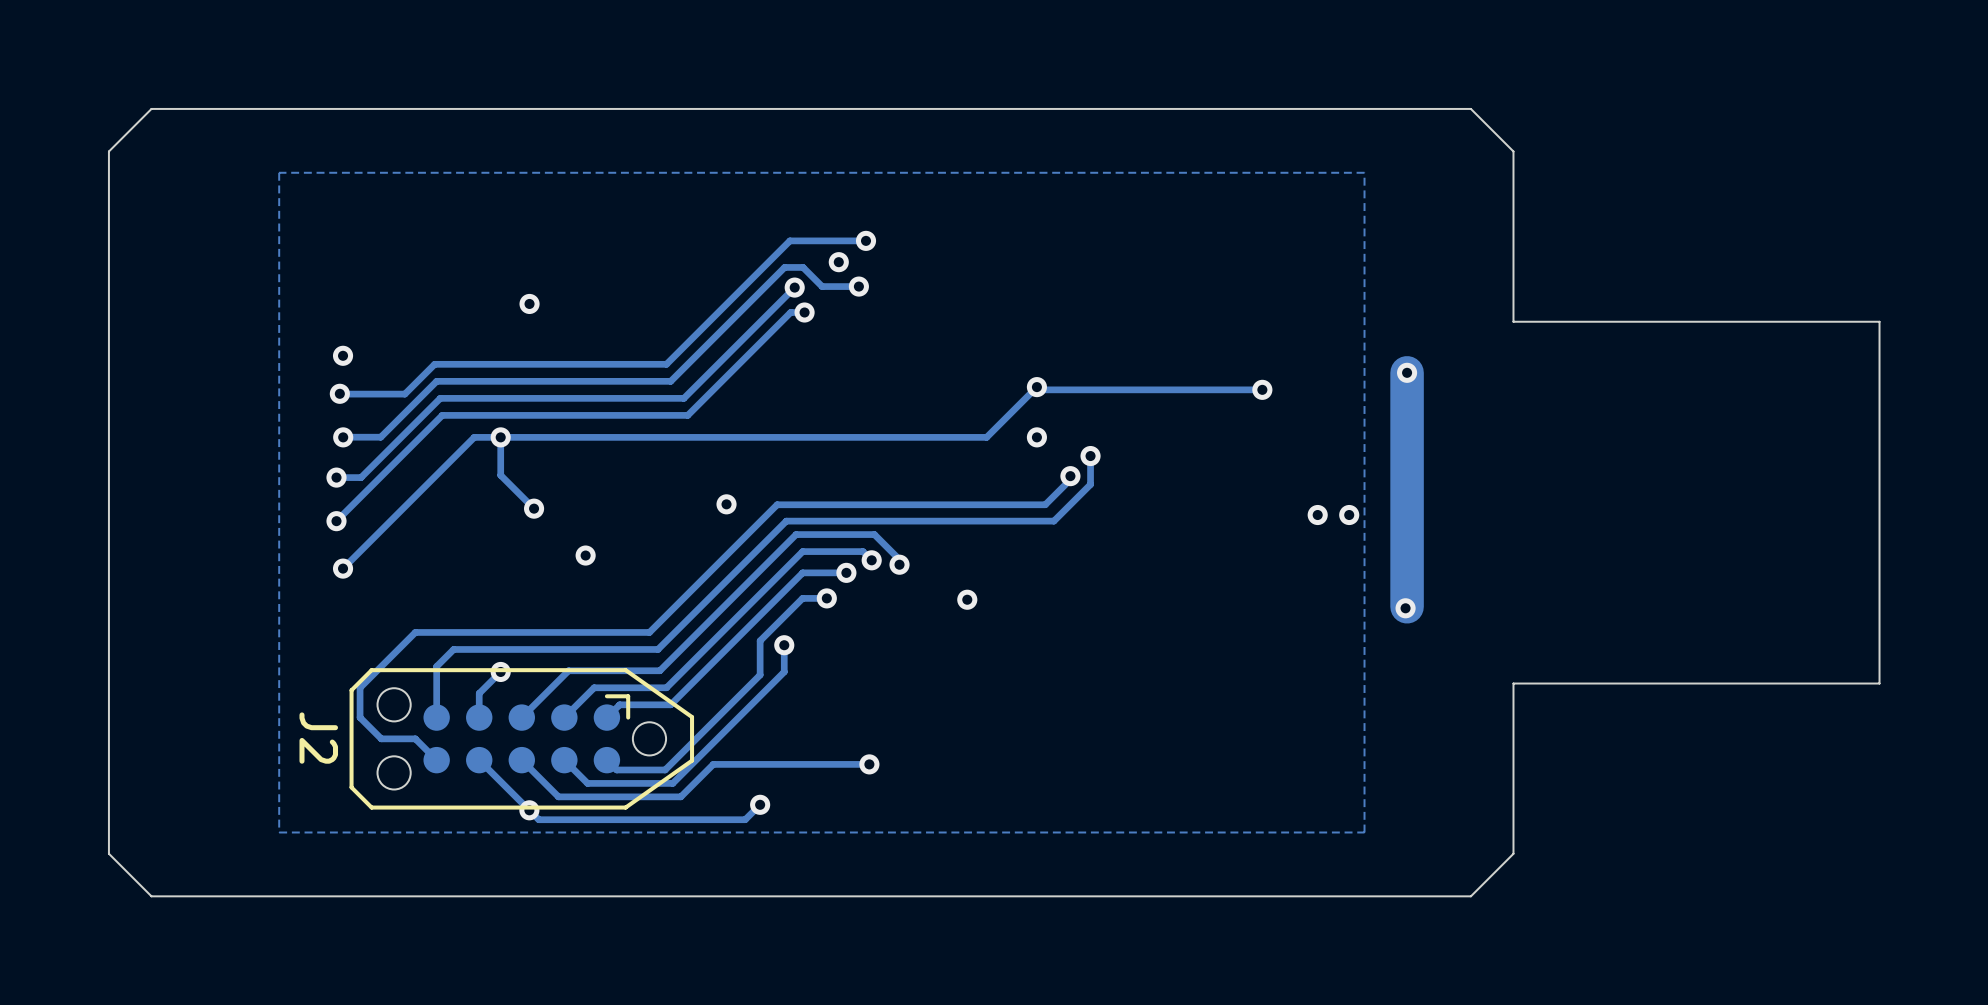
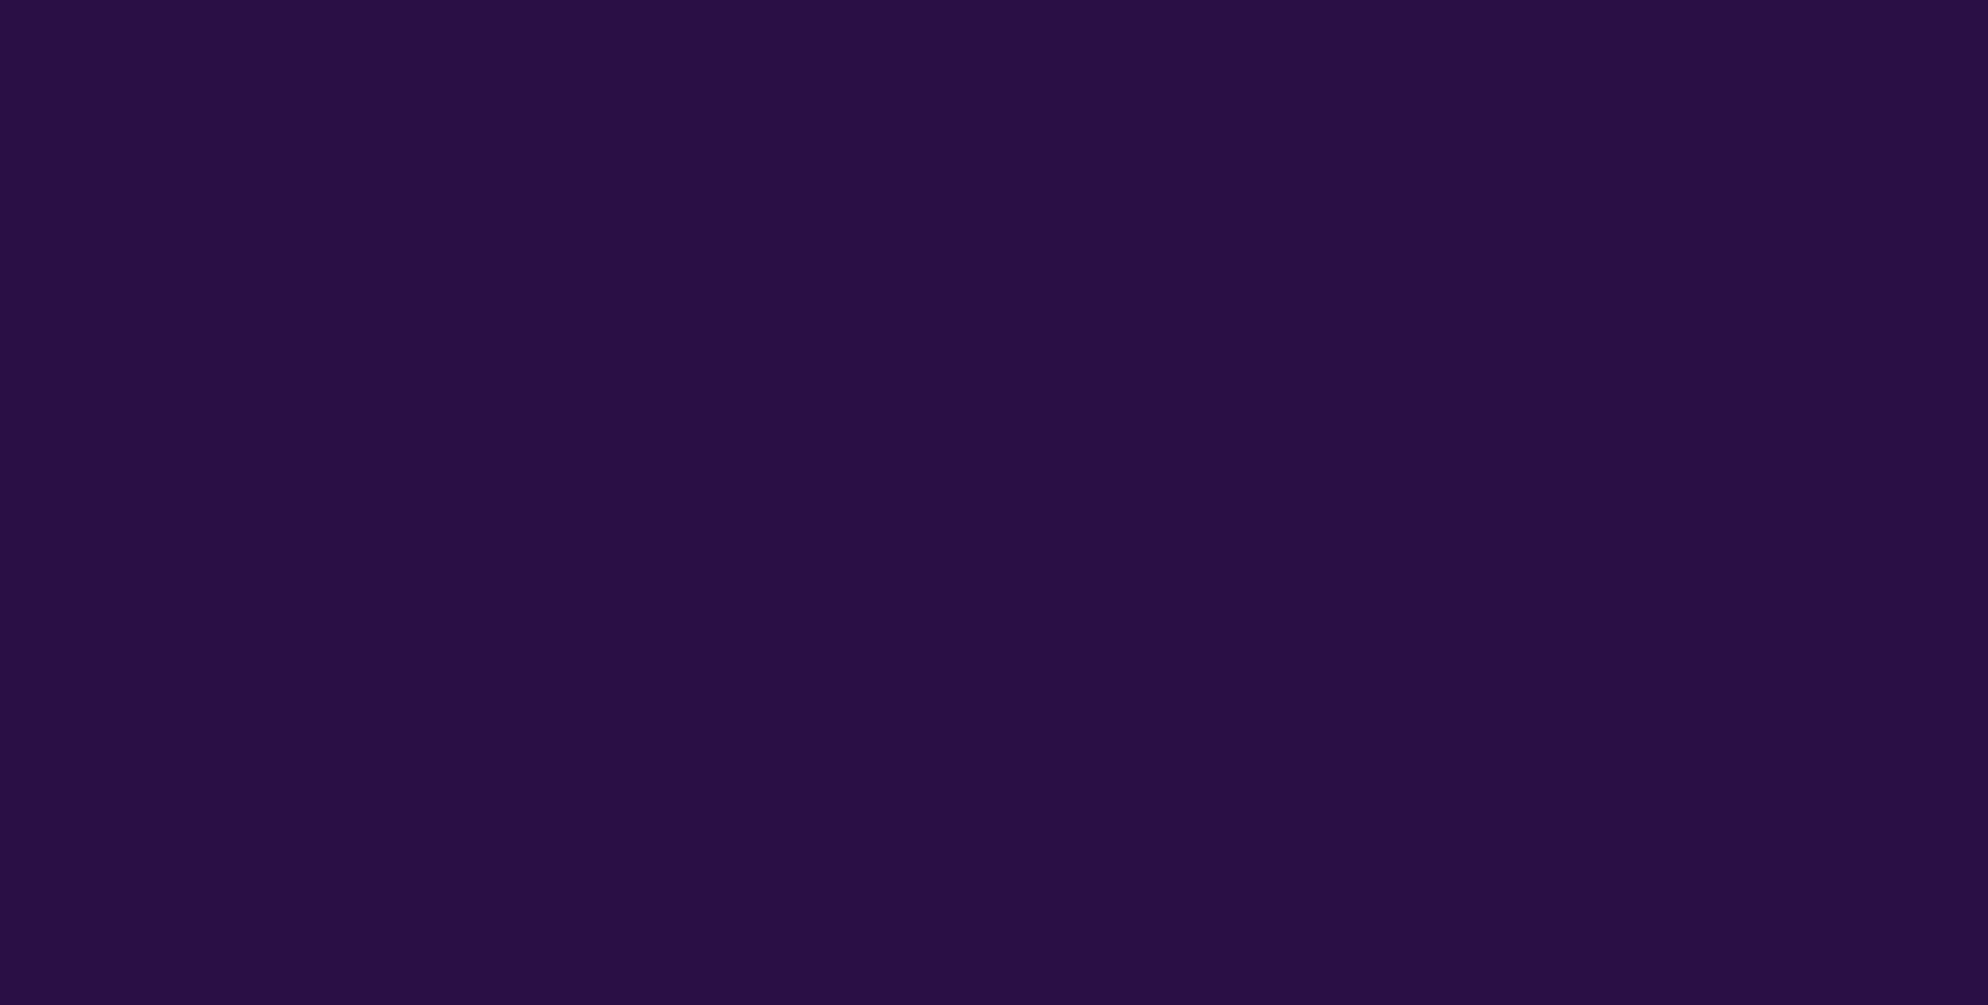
board edge: (1470, 108) (1513, 151) (1513, 321) (1879, 321) (1879, 683) (1513, 683) (1513, 853) (1470, 896) (151, 896) (108, 853) (108, 151) (151, 108) (1470, 108) -> none
zone outline: (1364, 172) (279, 172) (279, 832) (1364, 832) (1364, 172) -> none
track: (866, 240) (789, 240) (666, 364) (434, 364) (404, 394) (339, 394) -> none
via: (866, 240) -> none
via: (838, 262) -> none
track: (858, 286) (822, 286) (803, 267) (784, 267) (670, 381) (436, 381) (380, 437) (343, 437) -> none
via: (858, 286) -> none
track: (794, 287) (683, 398) (440, 398) (361, 477) (336, 477) -> none
via: (794, 287) -> none
via: (529, 303) -> none
track: (804, 312) (790, 312) (687, 415) (442, 415) (336, 521) -> none
via: (804, 312) -> none
via: (343, 355) -> none
track: (1407, 372) (1407, 606) -> none
via: (1407, 372) -> none
via: (1036, 387) -> none
track: (1262, 389) (1039, 389) (1036, 387) (986, 437) (474, 437) (343, 568) -> none
via: (1262, 389) -> none
via: (339, 393) -> none
via: (343, 437) -> none
track: (500, 437) (500, 475) (534, 508) -> none
via: (500, 437) -> none
via: (1036, 437) -> none
track: (1090, 456) (1090, 484) (1053, 521) (786, 521) (657, 649) (453, 649) (436, 666) (436, 717) -> none
via: (1090, 456) -> none
track: (1070, 476) (1070, 479) (1045, 504) (777, 504) (649, 632) (415, 632) (360, 687) (360, 717) (381, 738) (415, 738) (436, 760) -> none
via: (1070, 476) -> none
via: (336, 477) -> none
via: (726, 504) -> none
via: (534, 508) -> none
via: (1317, 515) -> none
via: (1349, 515) -> none
via: (336, 521) -> none
via: (585, 555) -> none
track: (871, 560) (862, 551) (802, 551) (666, 687) (594, 687) (564, 717) -> none
via: (871, 560) -> none
track: (899, 564) (899, 559) (874, 534) (796, 534) (659, 670) (568, 670) (521, 717) -> none
via: (899, 564) -> none
via: (343, 568) -> none
track: (846, 572) (802, 572) (670, 704) (619, 704) (606, 717) -> none
via: (846, 572) -> none
track: (826, 598) (802, 598) (760, 640) (760, 675) (665, 769) (616, 769) (606, 760) -> none
via: (826, 598) -> none
via: (967, 599) -> none
via: (1405, 608) -> none
track: (784, 645) (784, 671) (672, 783) (587, 783) (564, 760) -> none
via: (784, 645) -> none
track: (500, 671) (479, 693) (479, 717) -> none
via: (500, 671) -> none
J2: (521, 738) -> none
track: (479, 760) (538, 819) (745, 819) (760, 804) -> none
track: (521, 760) (558, 796) (680, 796) (713, 764) (869, 764) -> none
via: (869, 764) -> none
via: (760, 804) -> none
via: (529, 810) -> none

